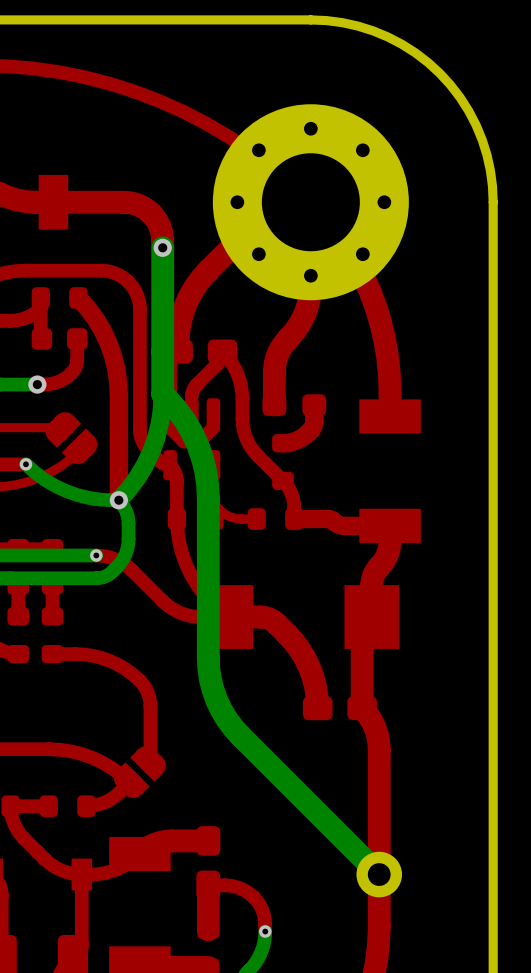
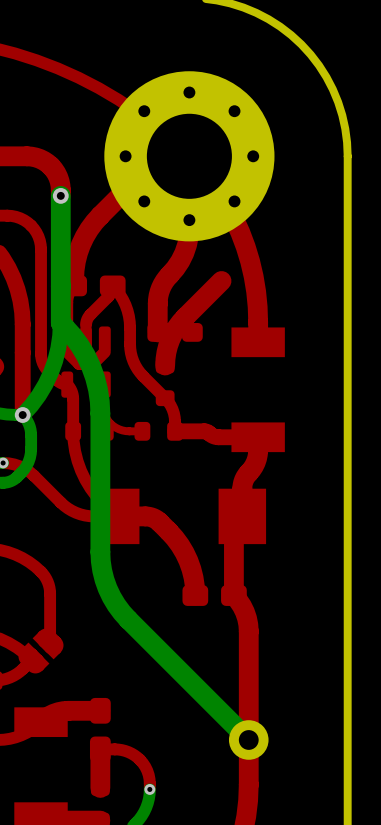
top track: (314, 405) (314, 423) (311, 429) (296, 440) (282, 443) -> (221, 280) (176, 327) (168, 345) (165, 365)

